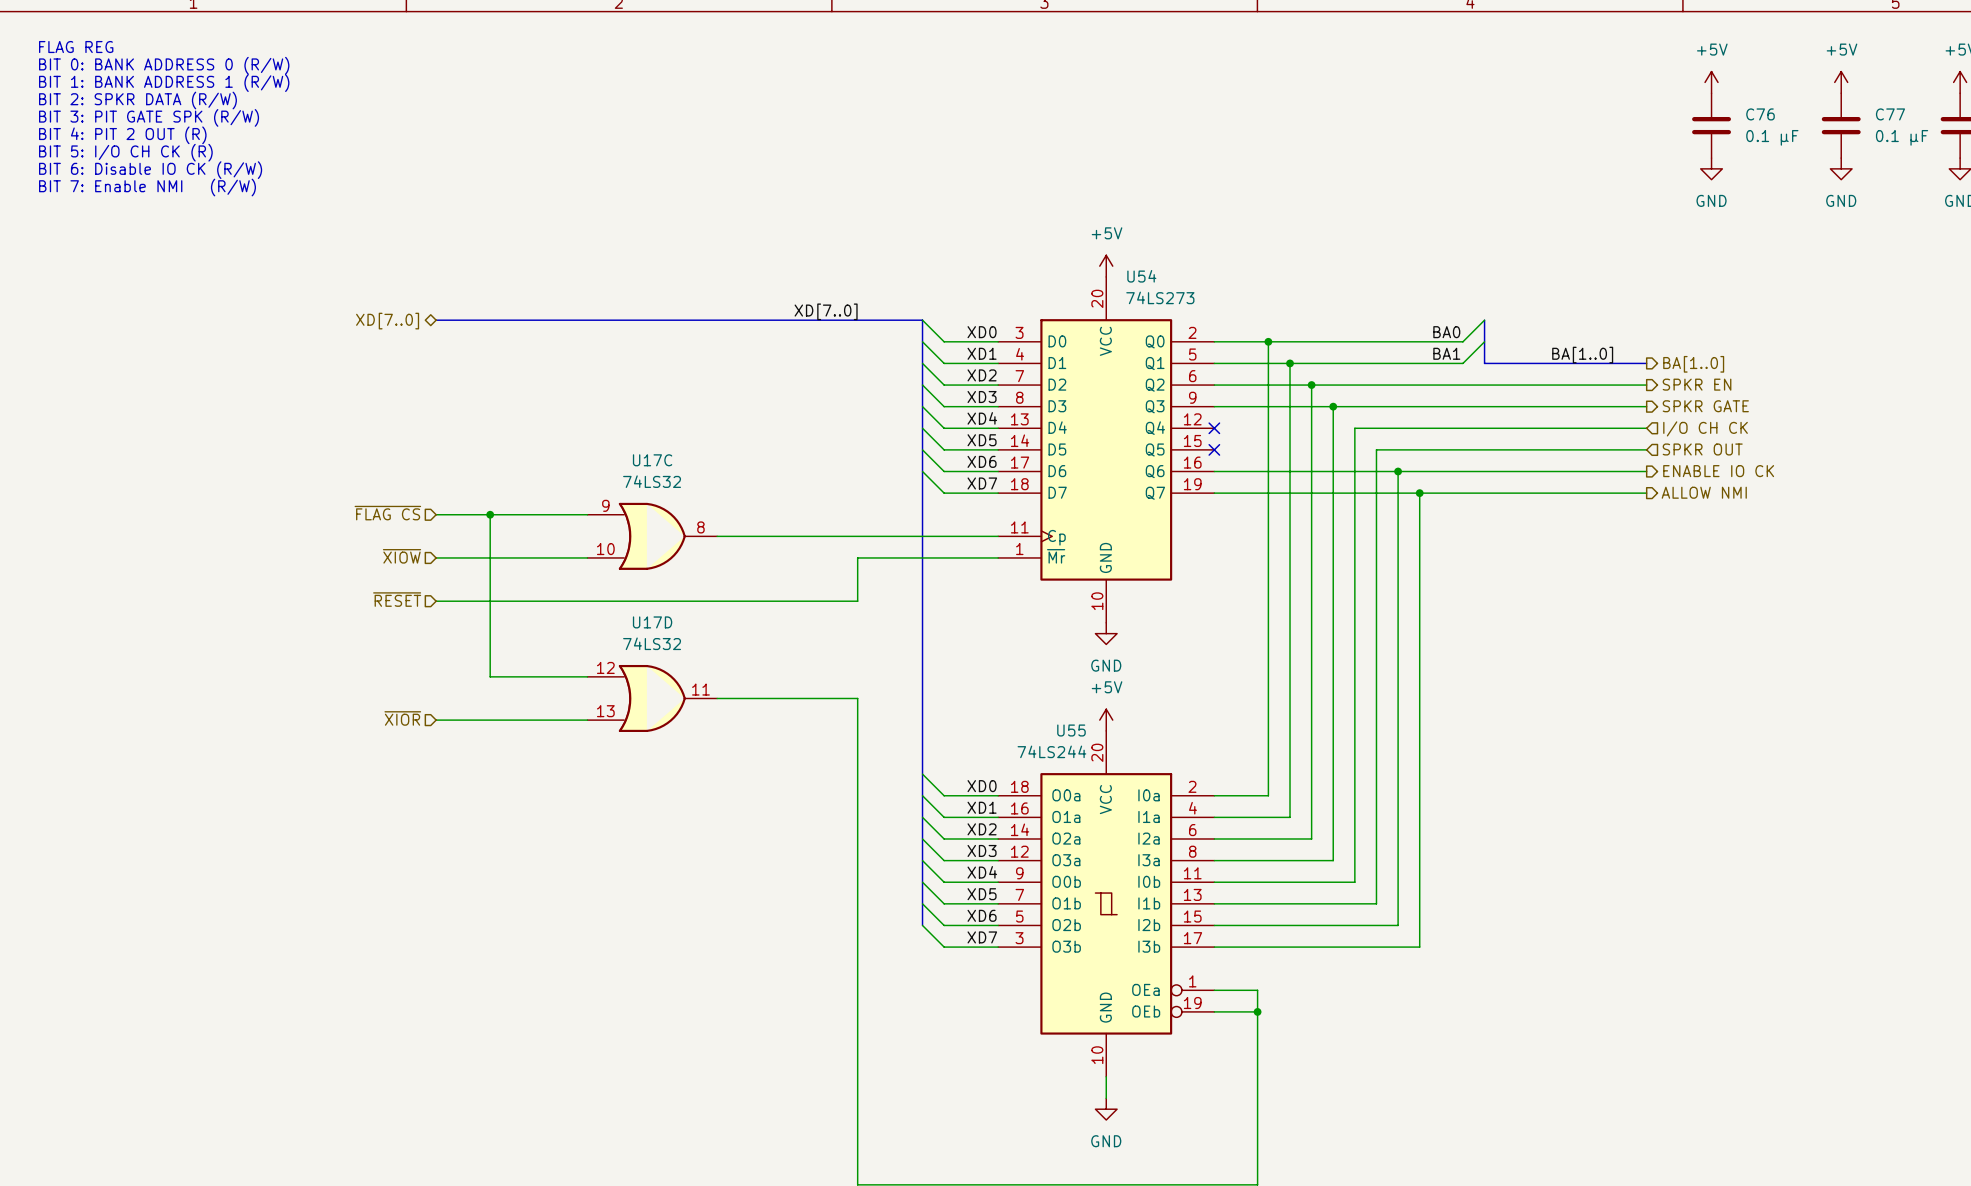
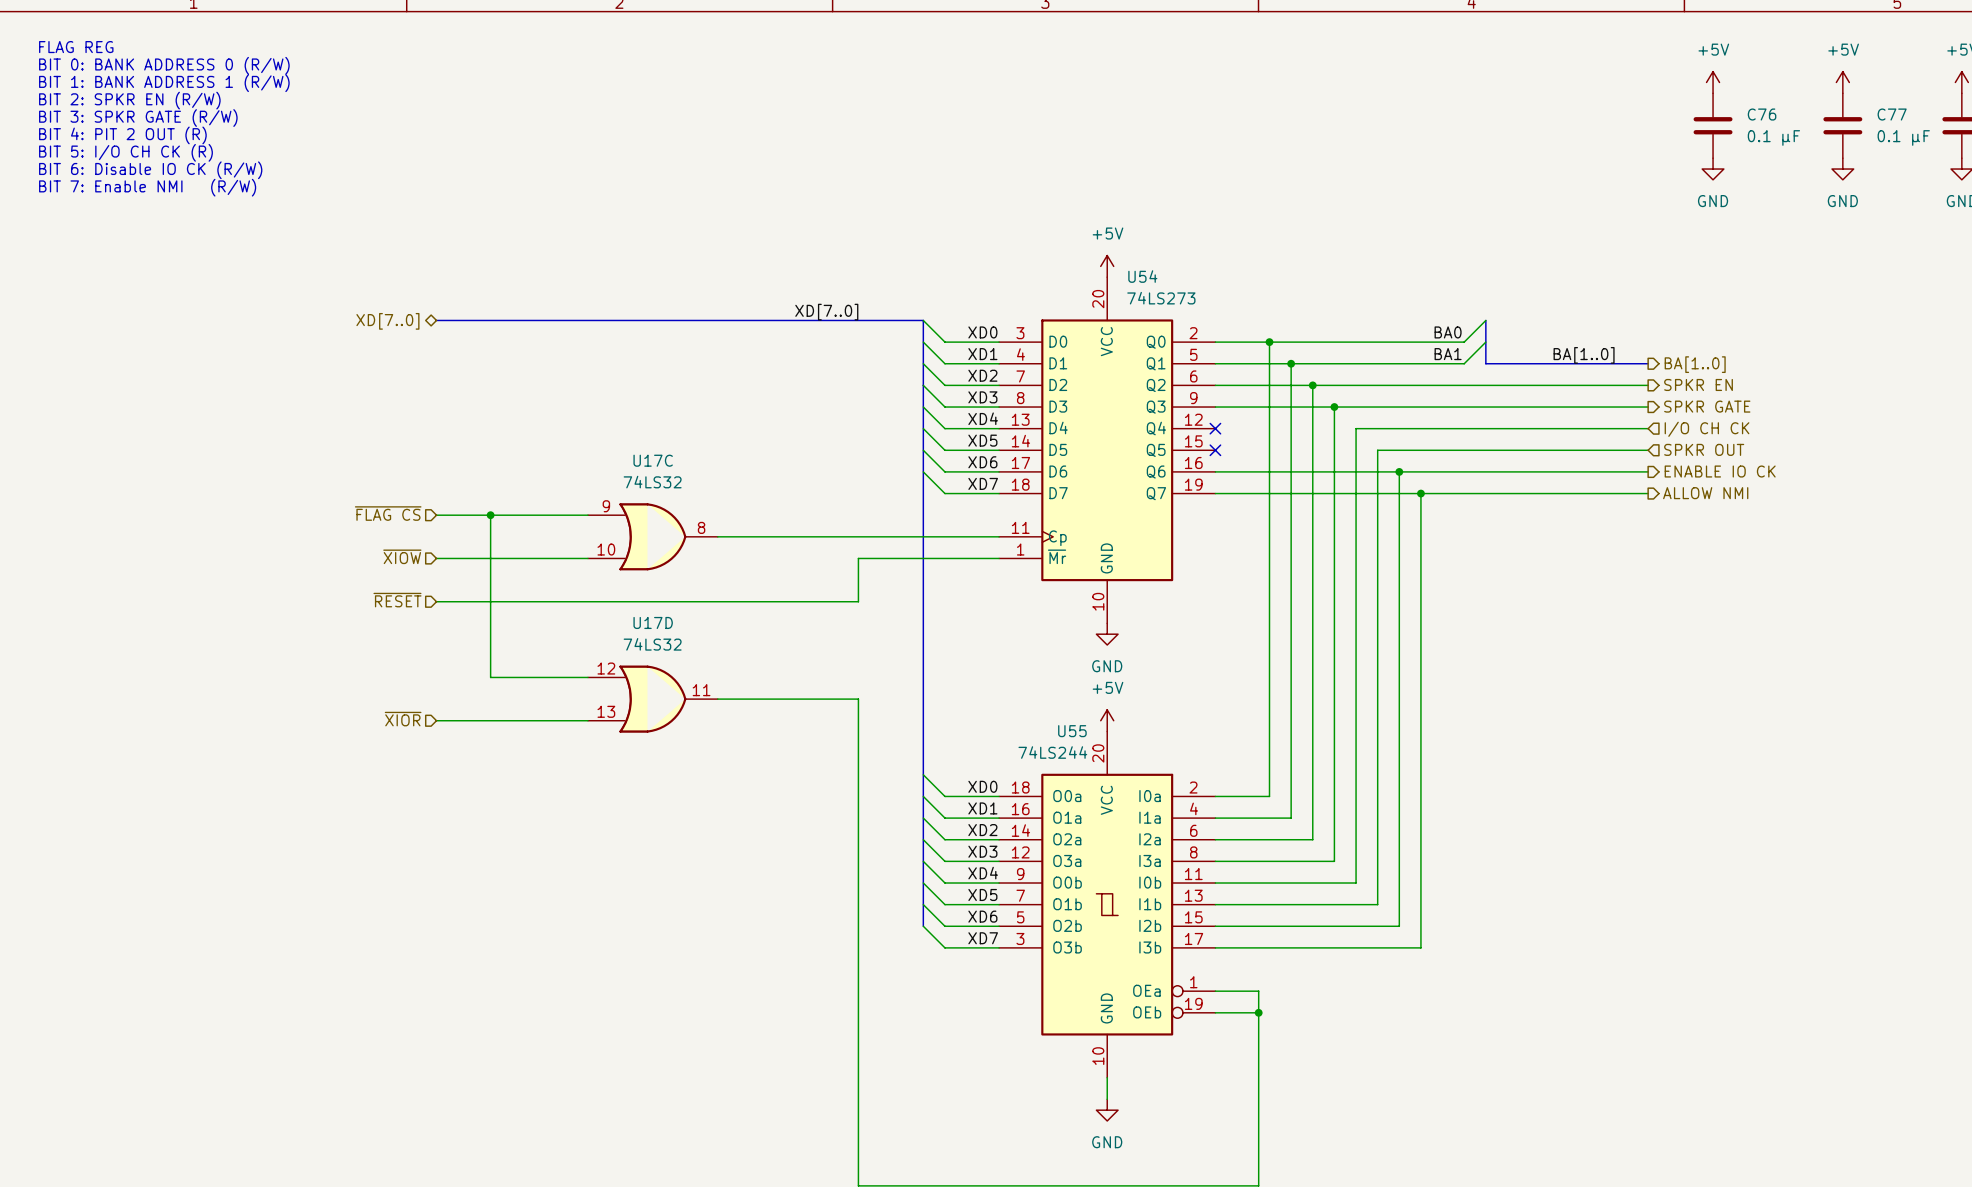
text: BIT 2: SPKR DATA (R/W) (137, 100) -> BIT 2: SPKR EN (R/W) (129, 100)
text: BIT 3: PIT GATE SPK (R/W) (149, 117) -> BIT 3: SPKR GATE (R/W) (138, 118)

